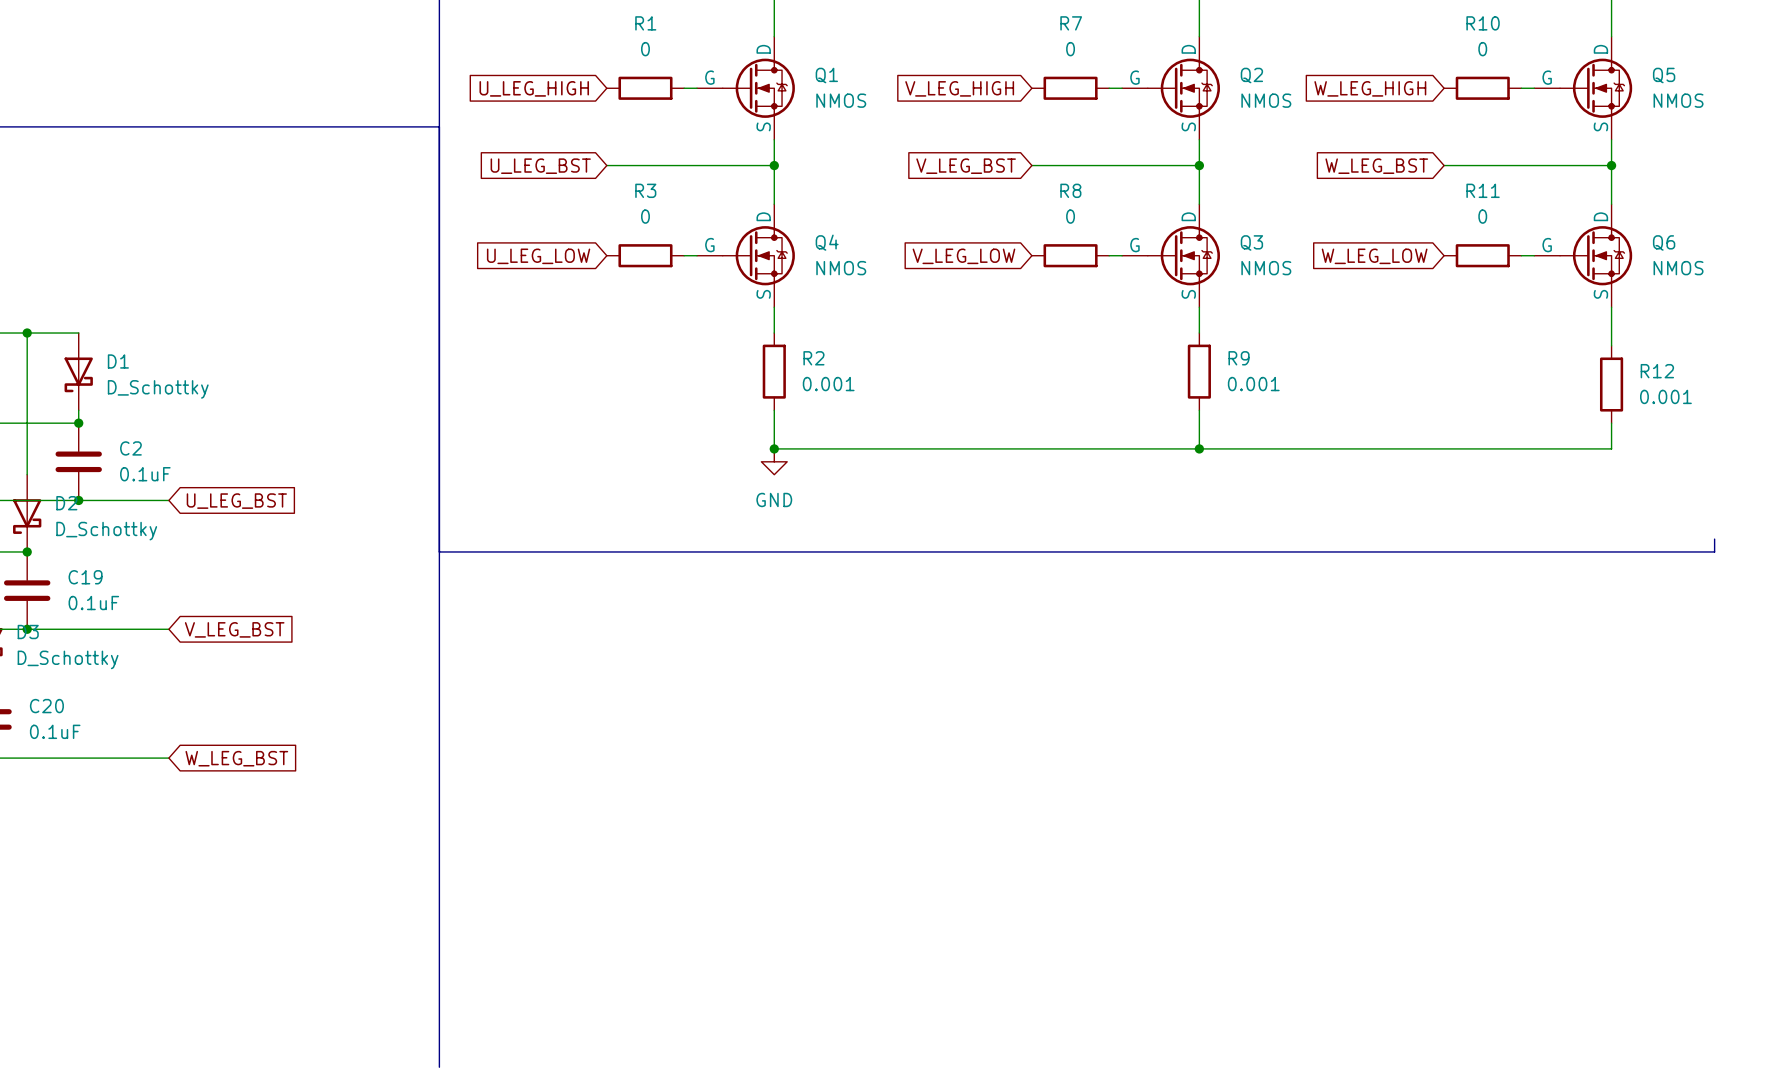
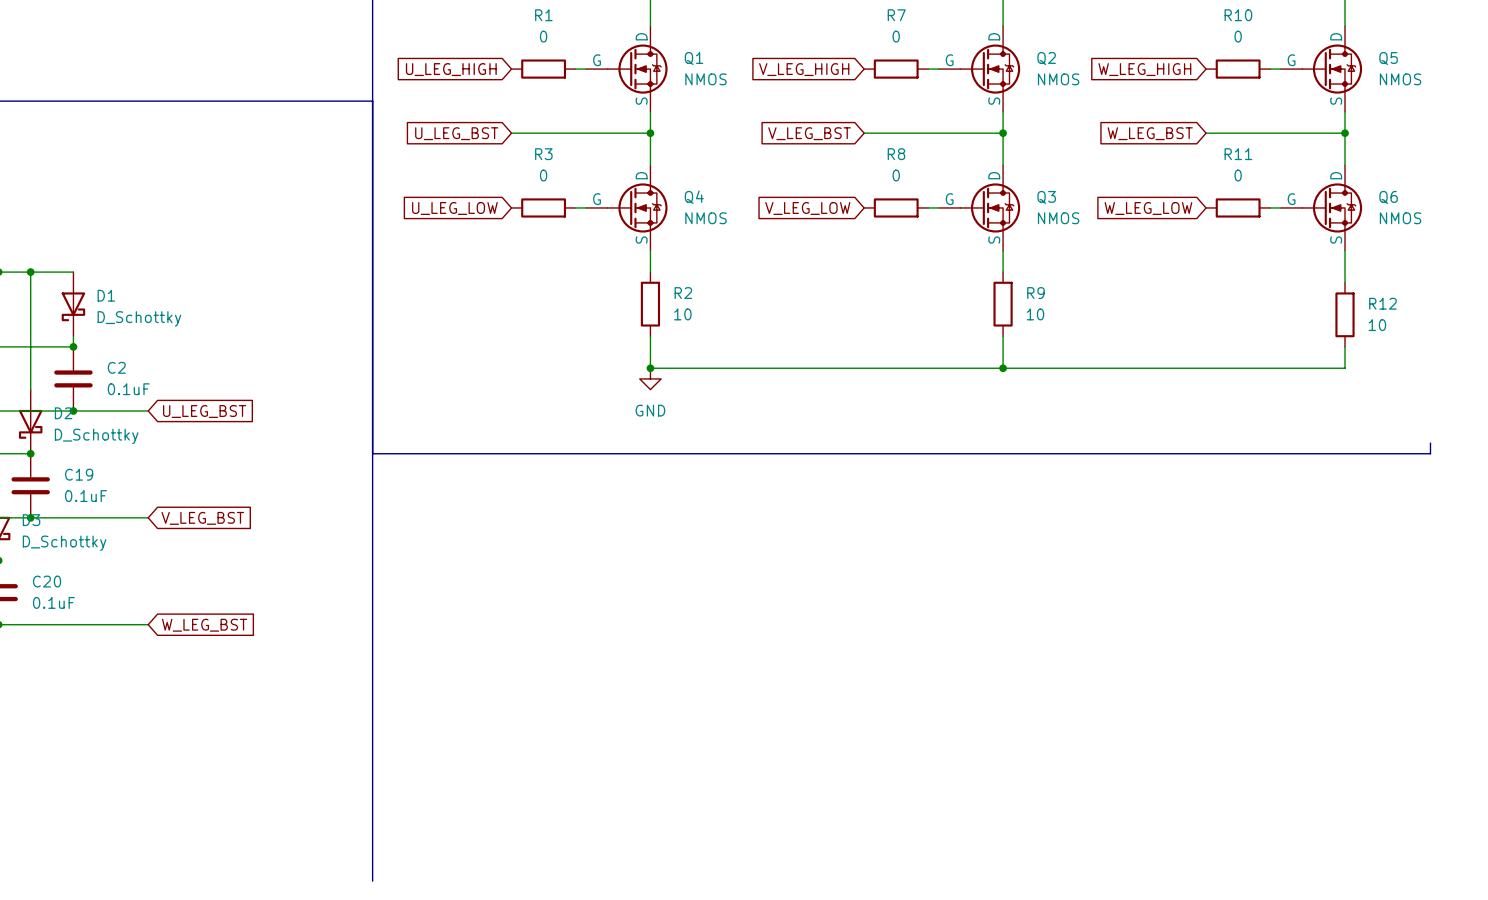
R2 value: 0.001 (828, 384) -> 10 (682, 314)
R9 value: 0.001 (1253, 384) -> 10 (1035, 314)
R12 value: 0.001 (1665, 396) -> 10 (1377, 325)

